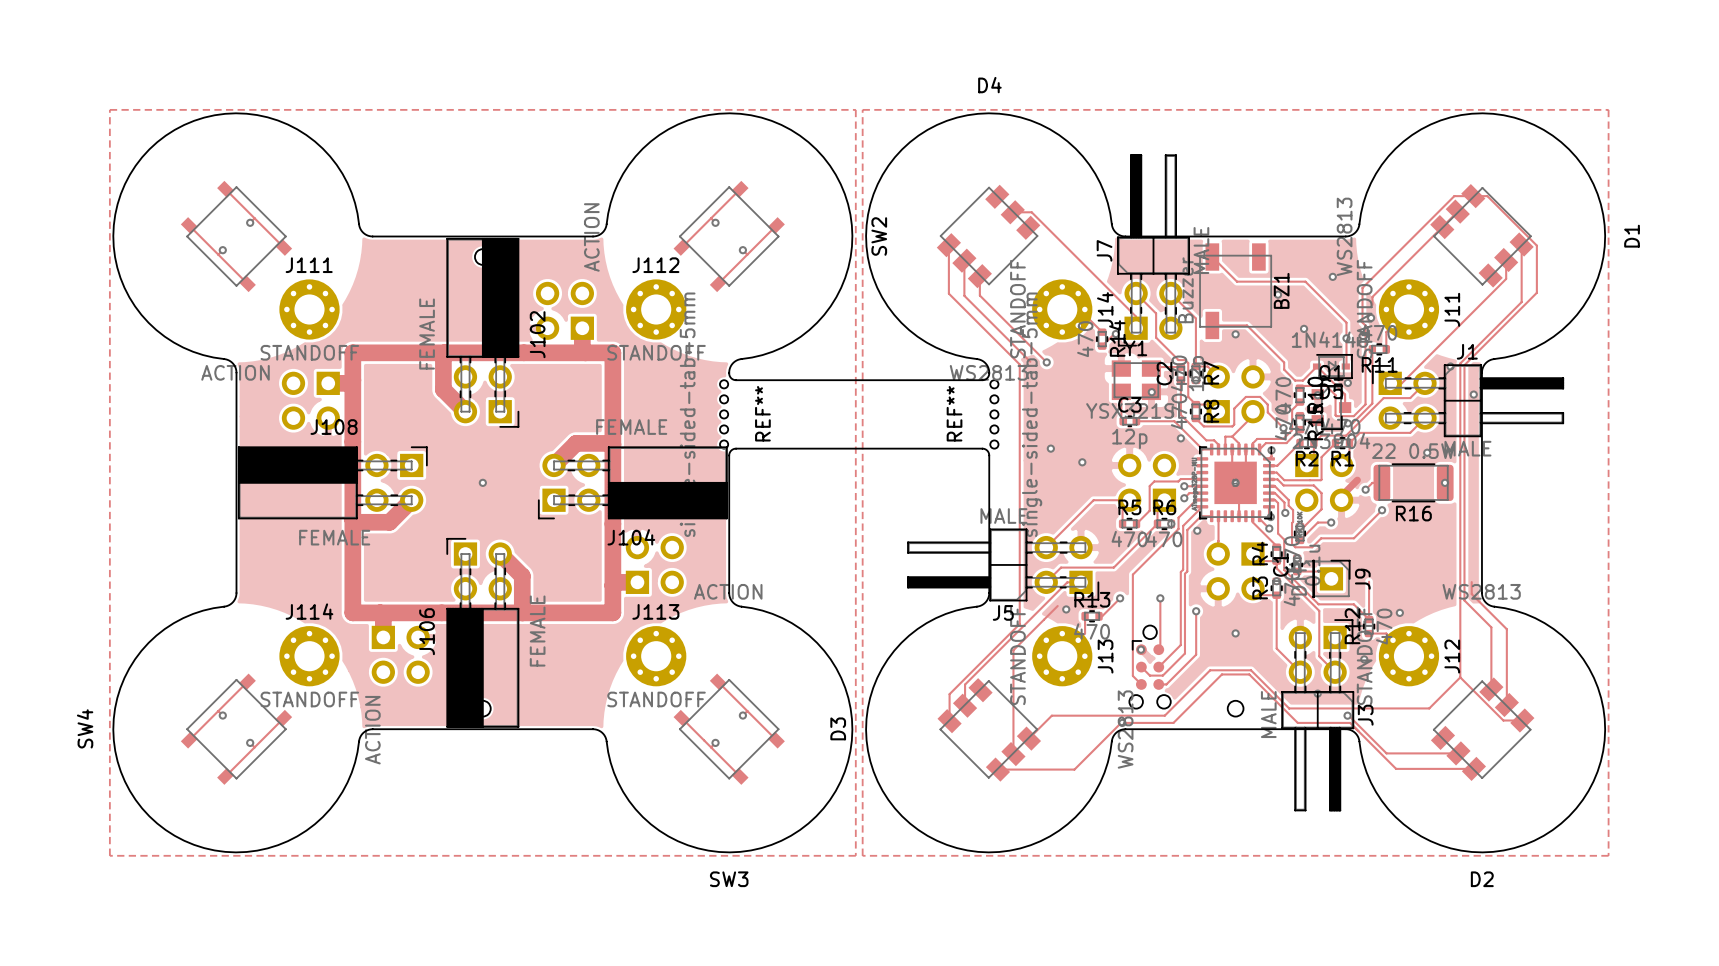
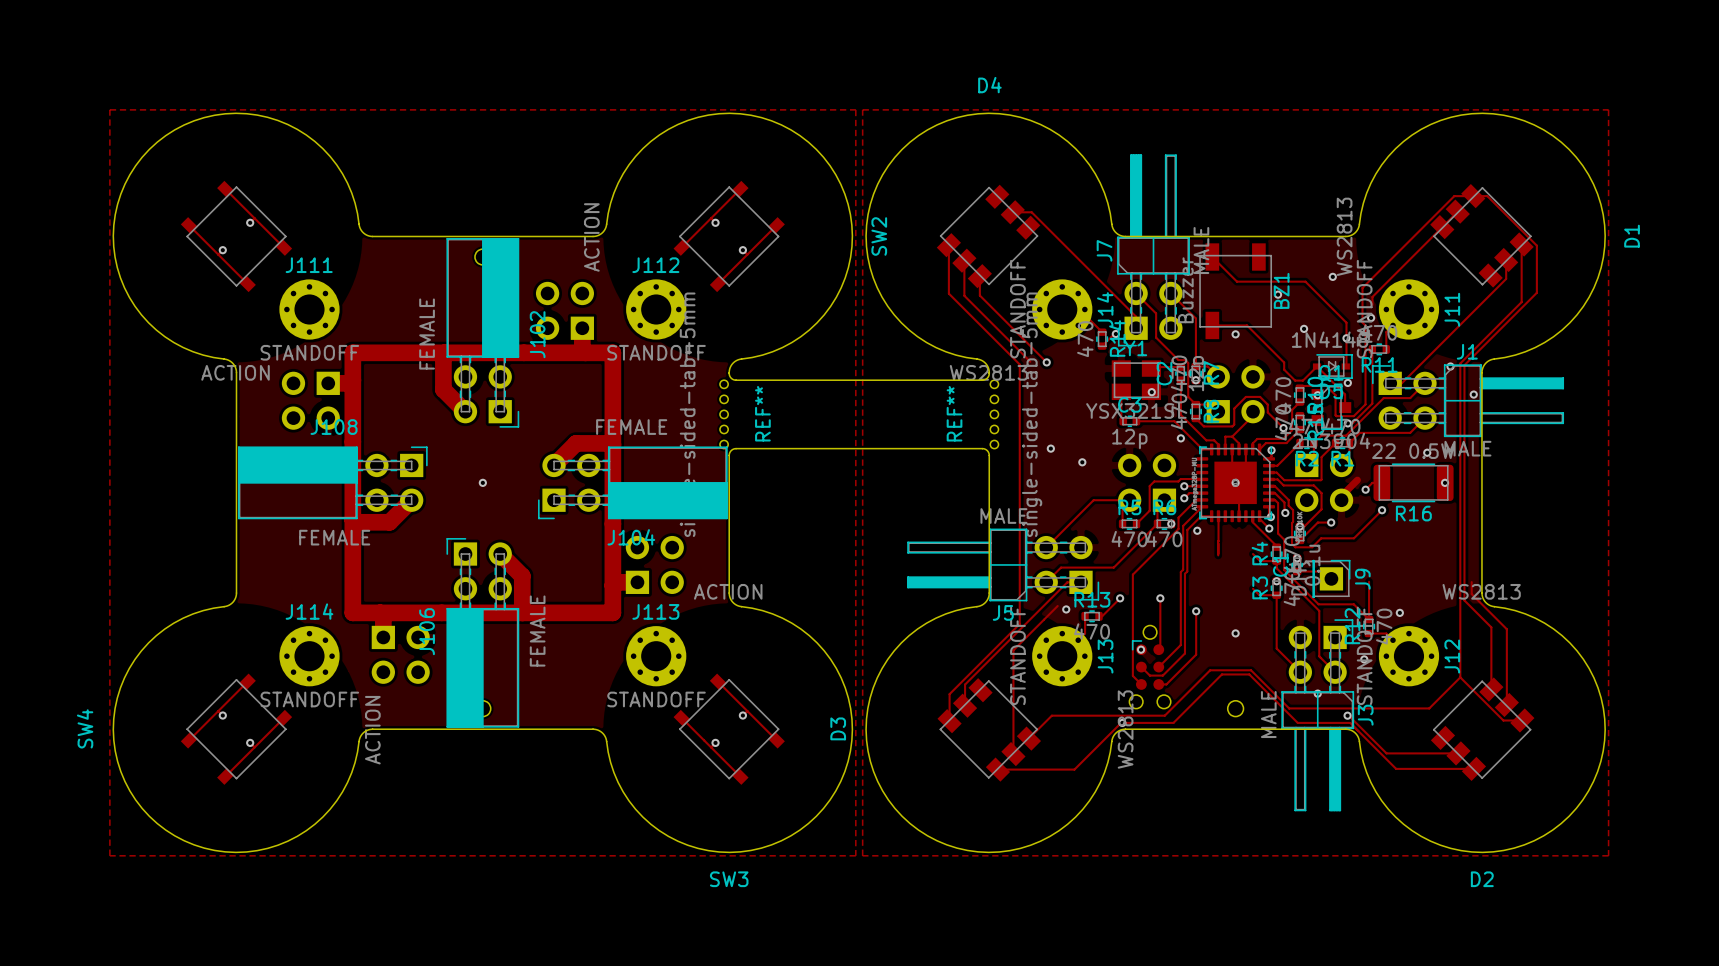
part: (1235, 571) -> none

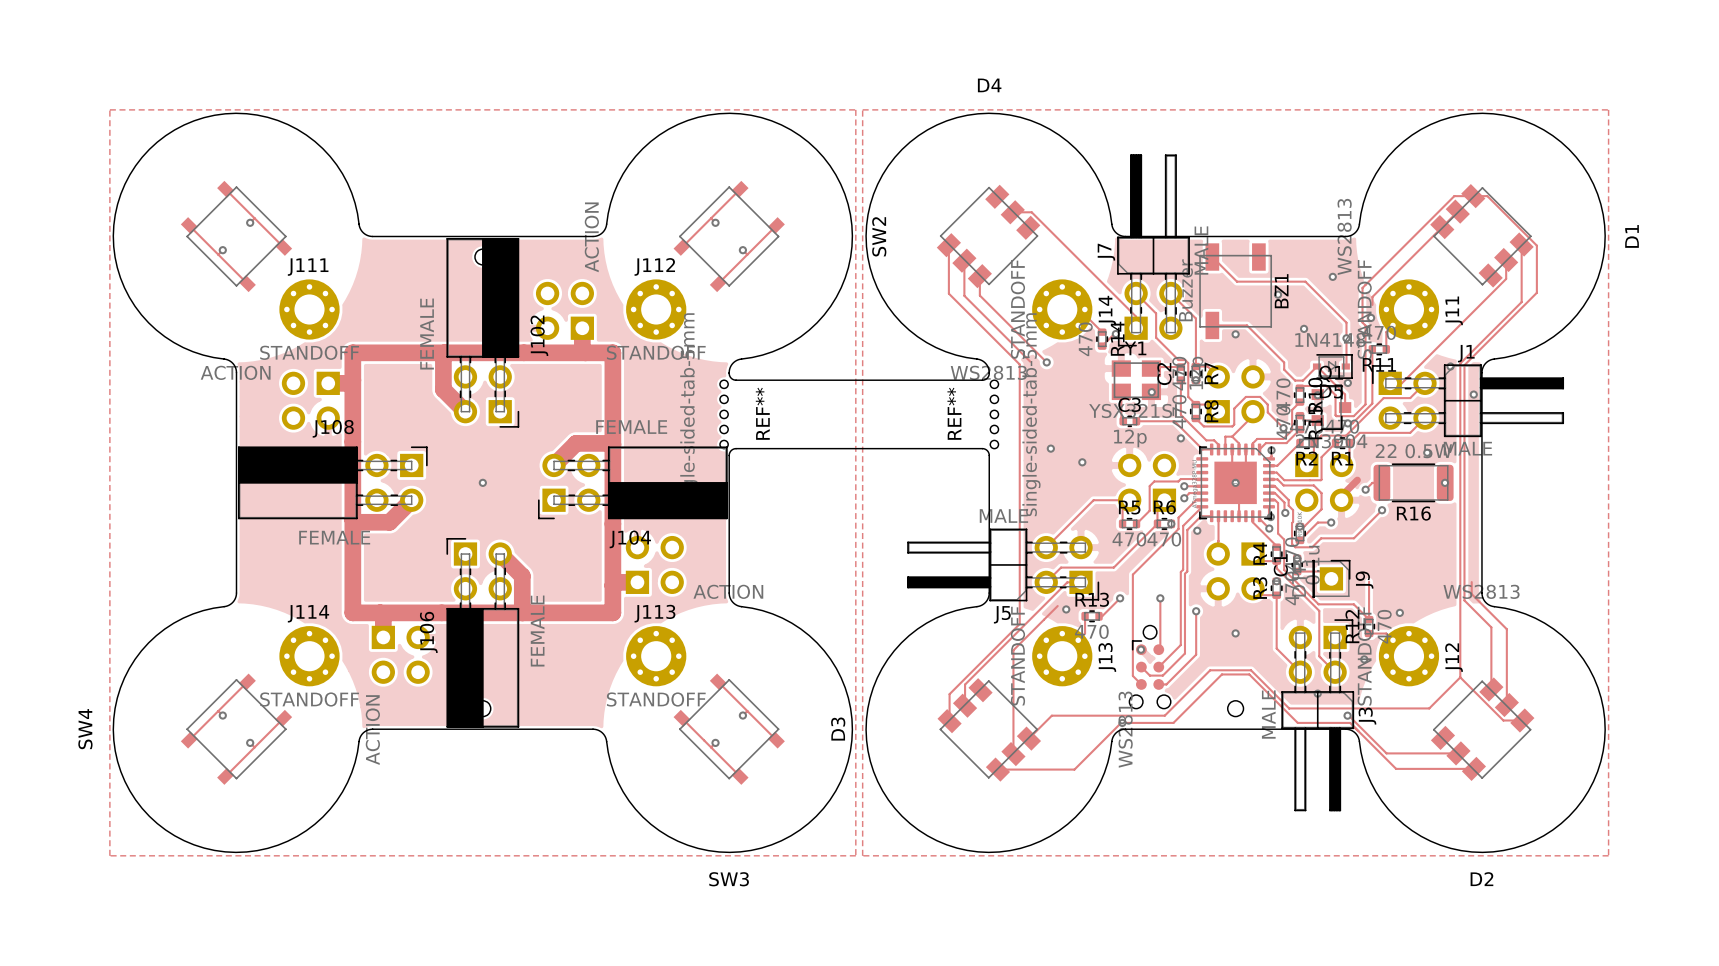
part: none -> (1235, 571)

